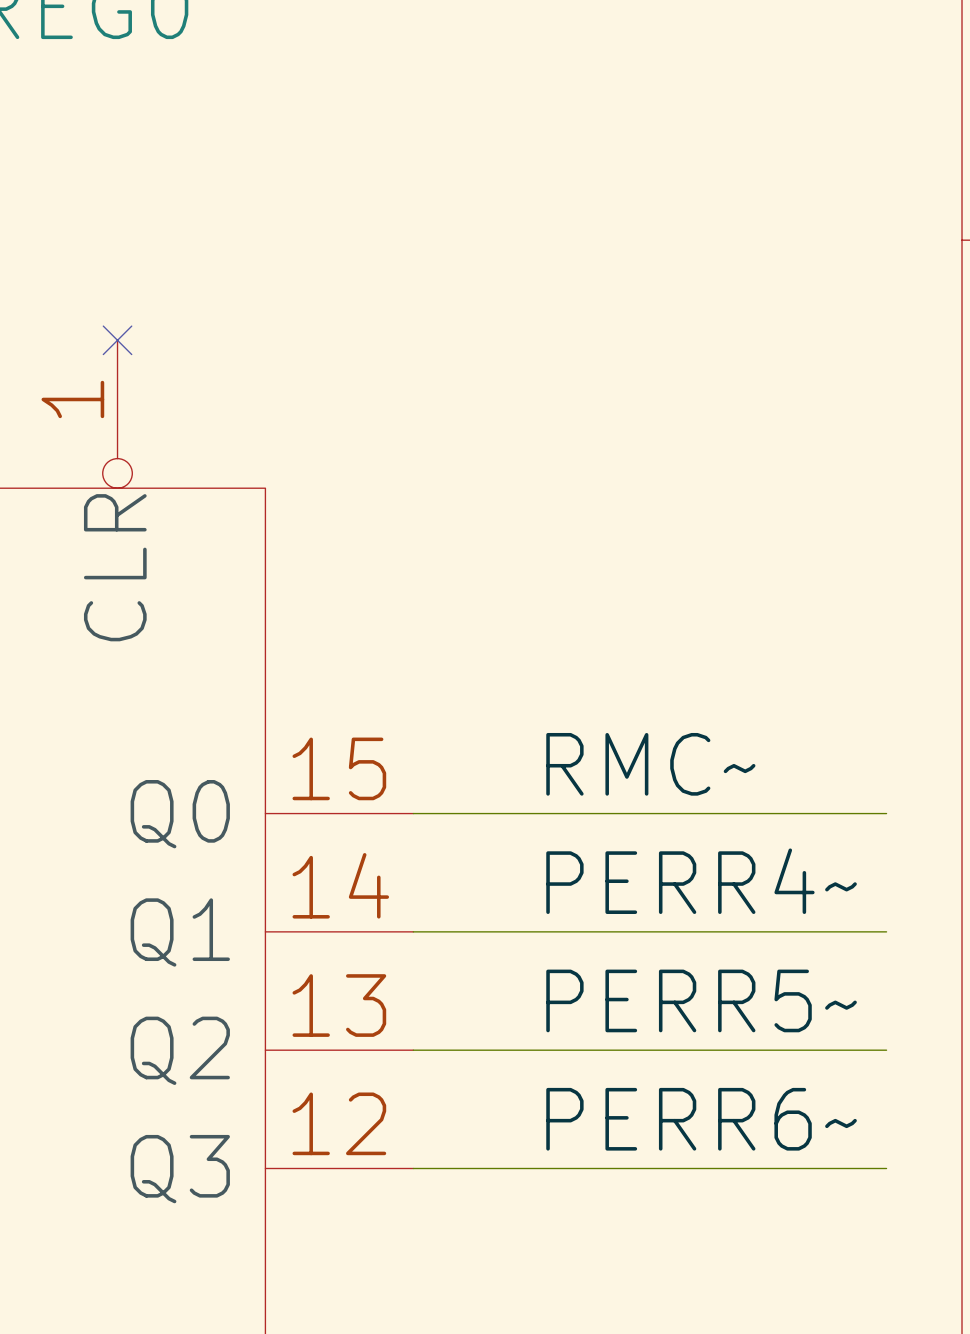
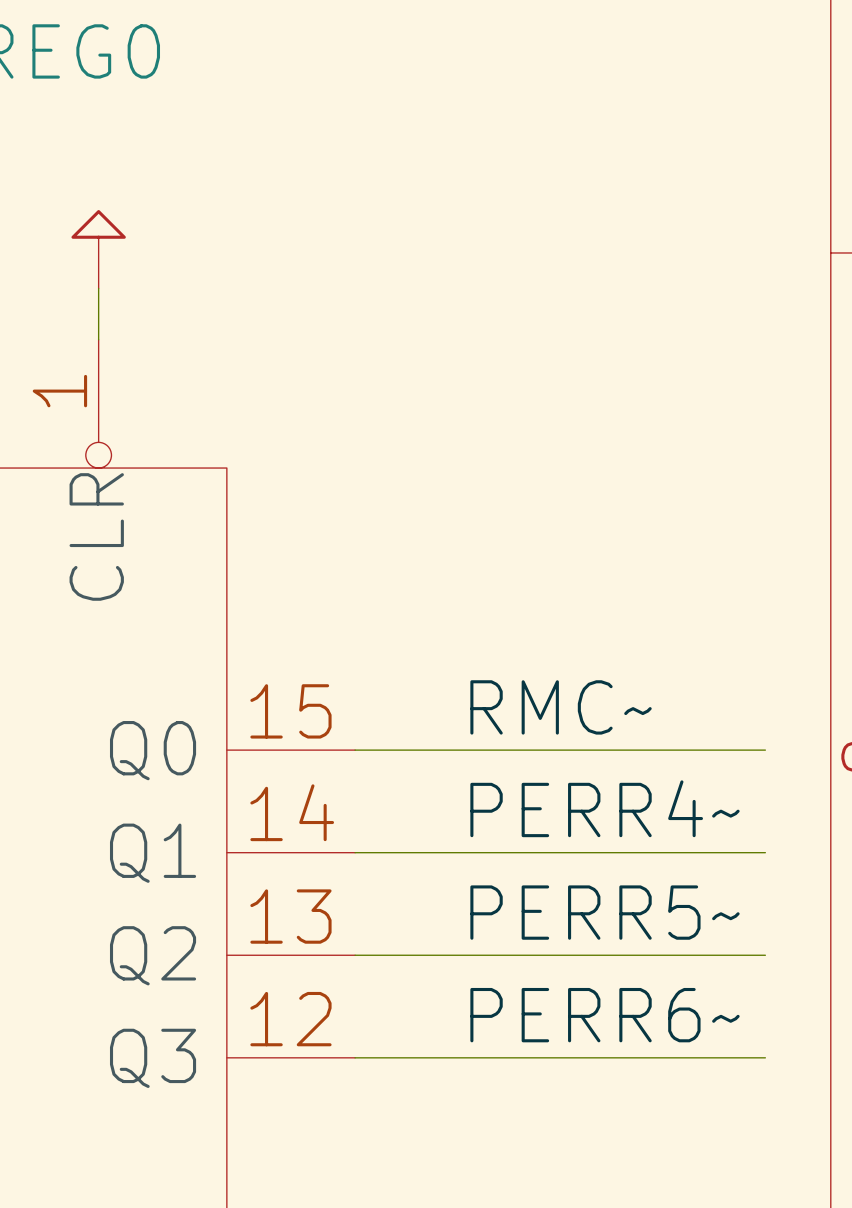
power symbol: none -> (98, 249)
wire: none -> (98, 288) (98, 339)
no-connect mark: (117, 340) -> none

